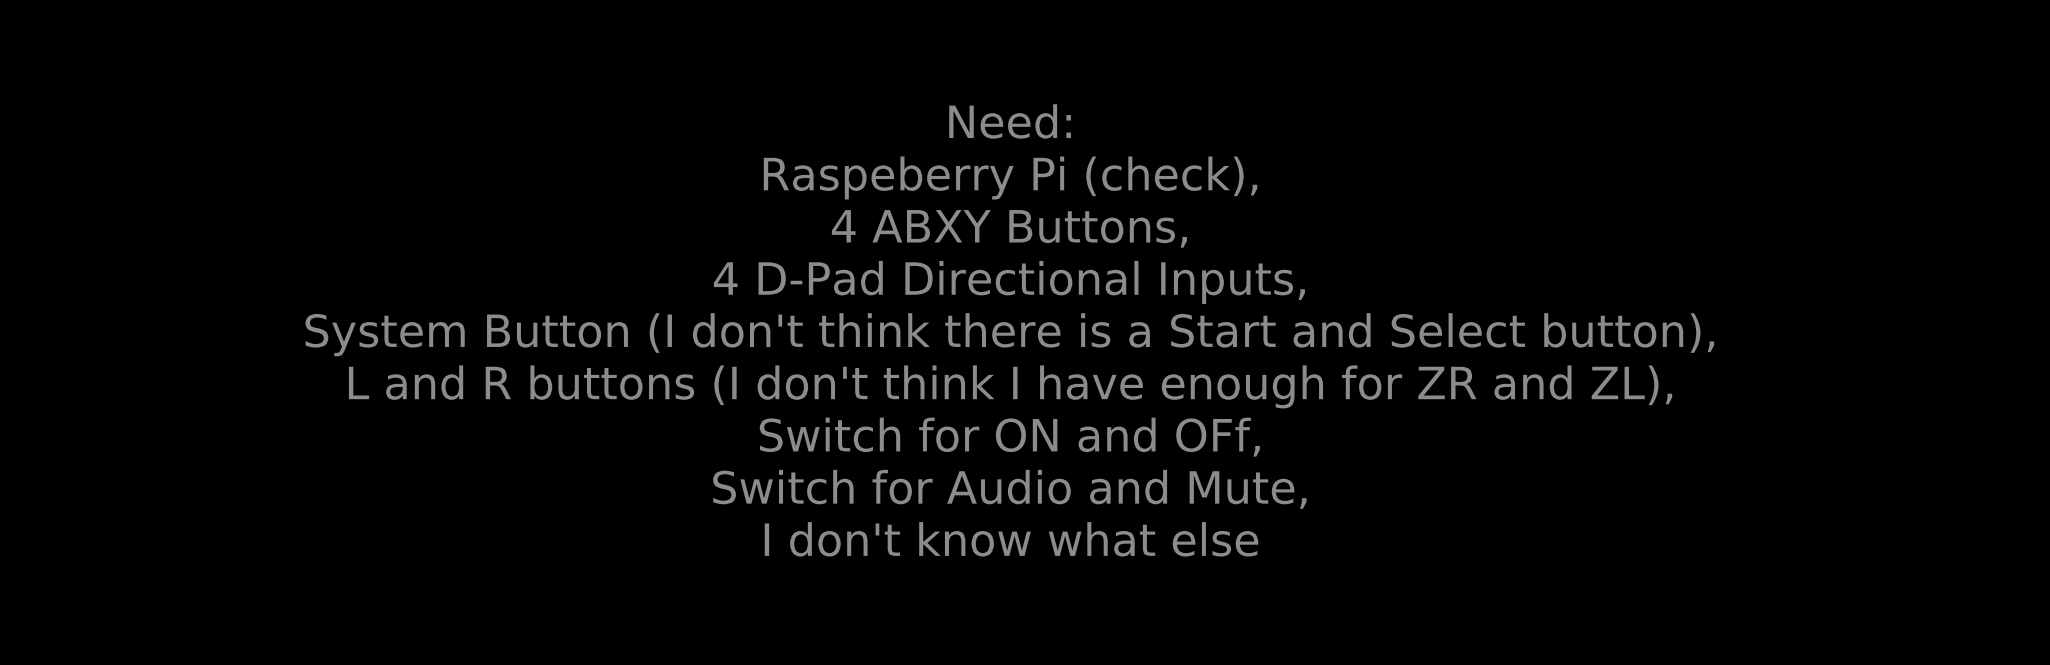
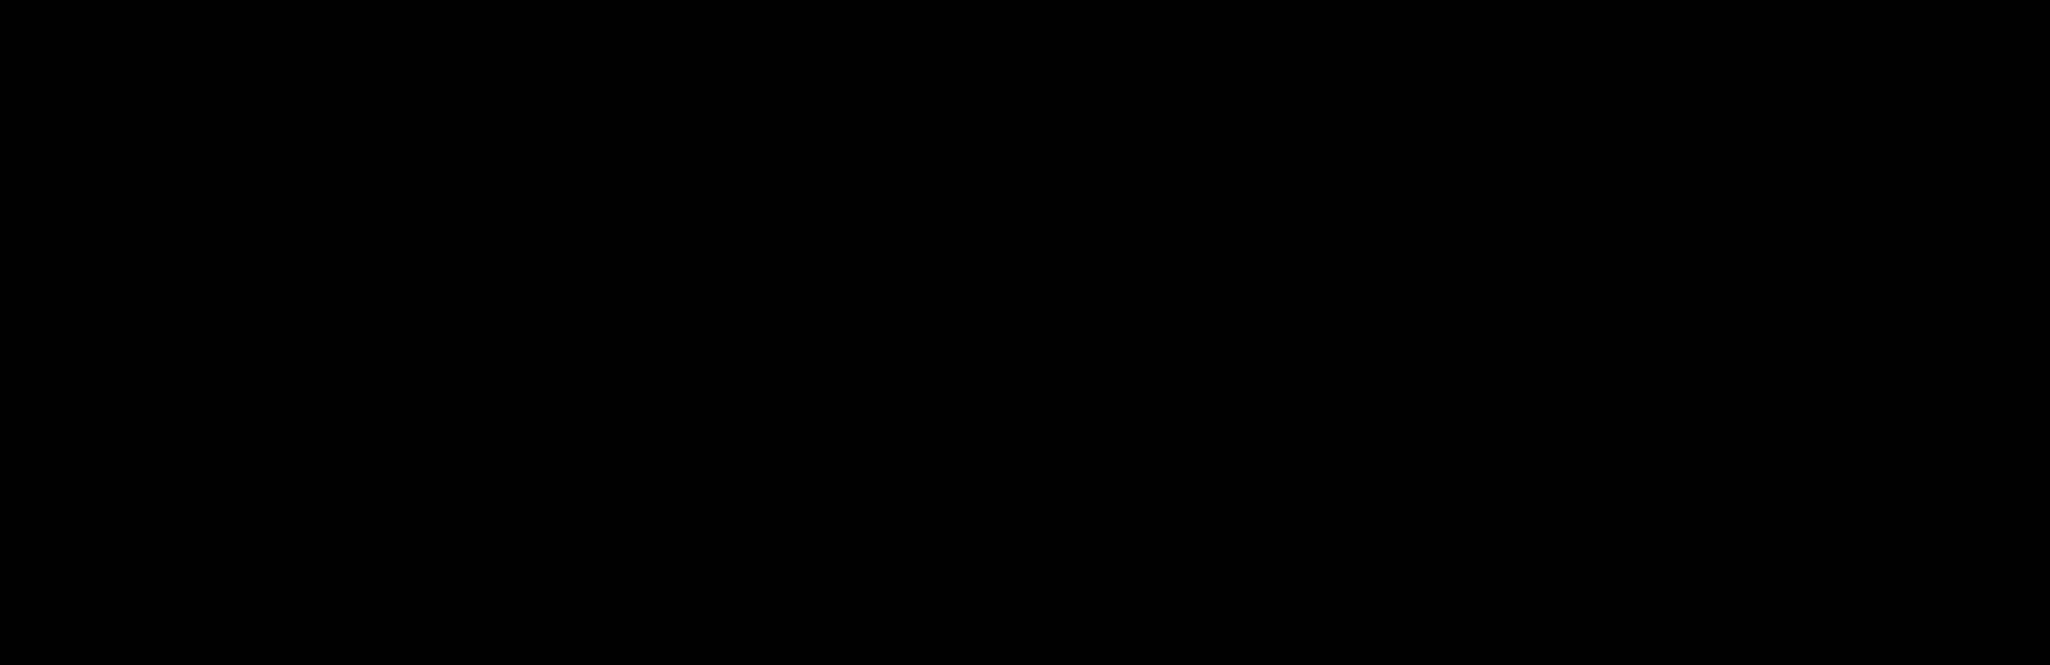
text: Need: (1010, 121) -> none
text: Raspeberry Pi (check), (1010, 178) -> none
text: 4 ABXY Buttons, (1009, 228) -> none
text: 4 D-Pad Directional Inputs, (1009, 282) -> none
text: System Button (I don't think there is a Start and Select button), (1009, 334) -> none
text: L and R buttons (I don't think I have enough for ZR and ZL), (1010, 386) -> none
text: Switch for ON and OFf, (1009, 437) -> none
text: Switch for Audio and Mute, (1009, 489) -> none
text: I don't know what else (1011, 539) -> none

